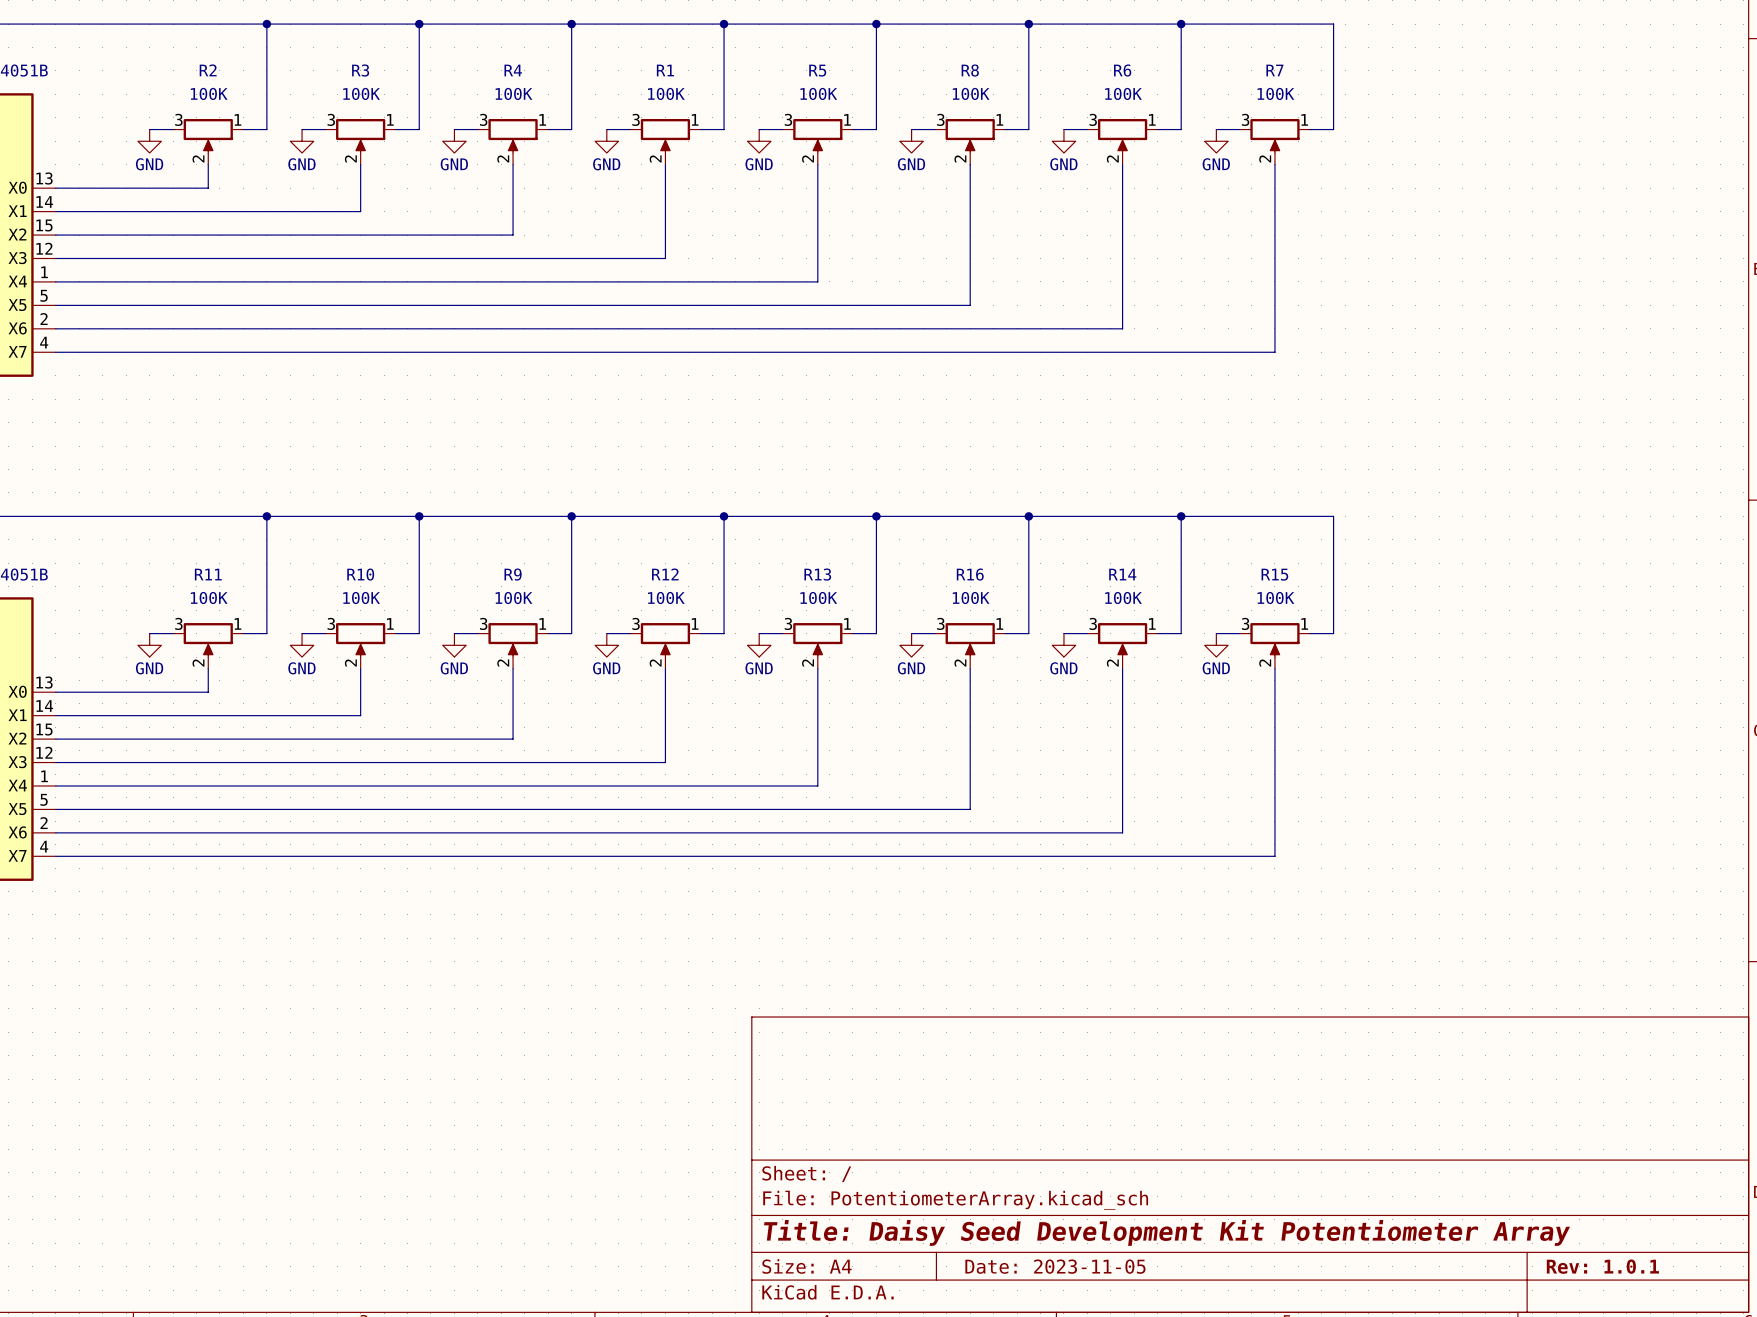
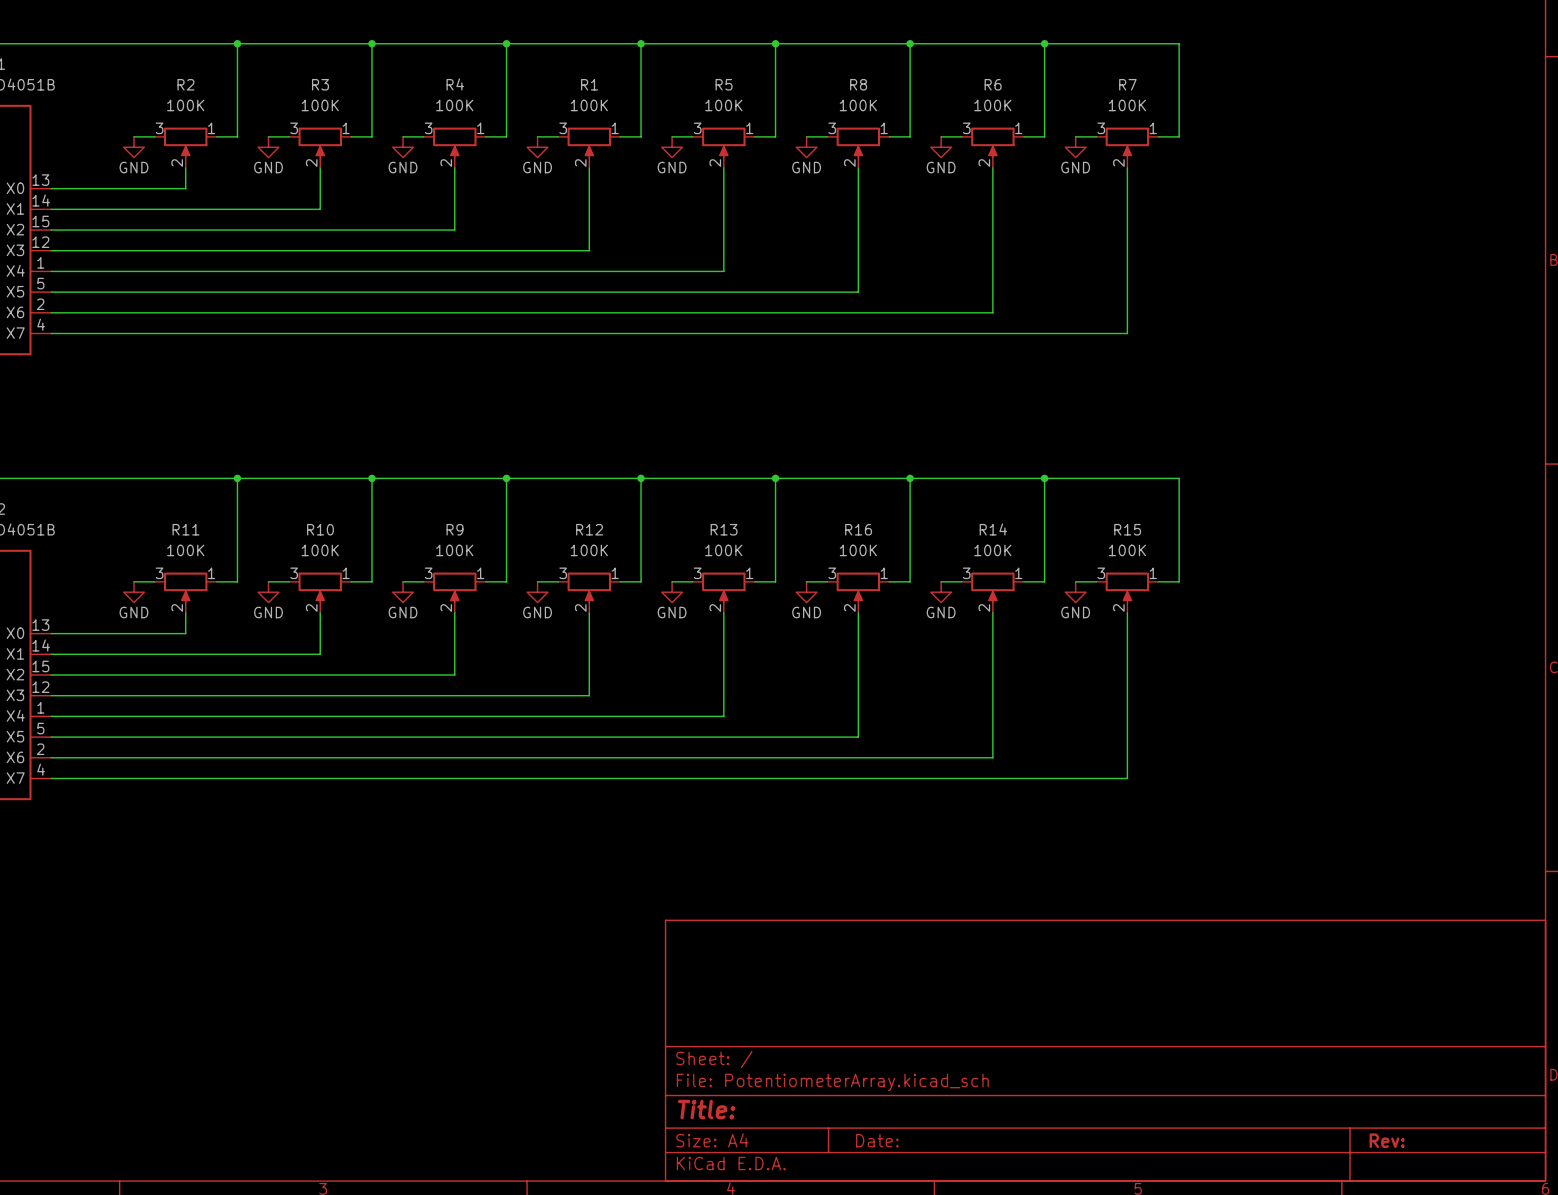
title block: Title: Daisy Seed Development Kit Potentiometer Array (1167, 1232) -> Title: (706, 1109)
title block: Date: 2023-11-05 (1055, 1266) -> Date: (877, 1140)
title block: Rev: 1.0.1 (1602, 1266) -> Rev: (1387, 1140)

